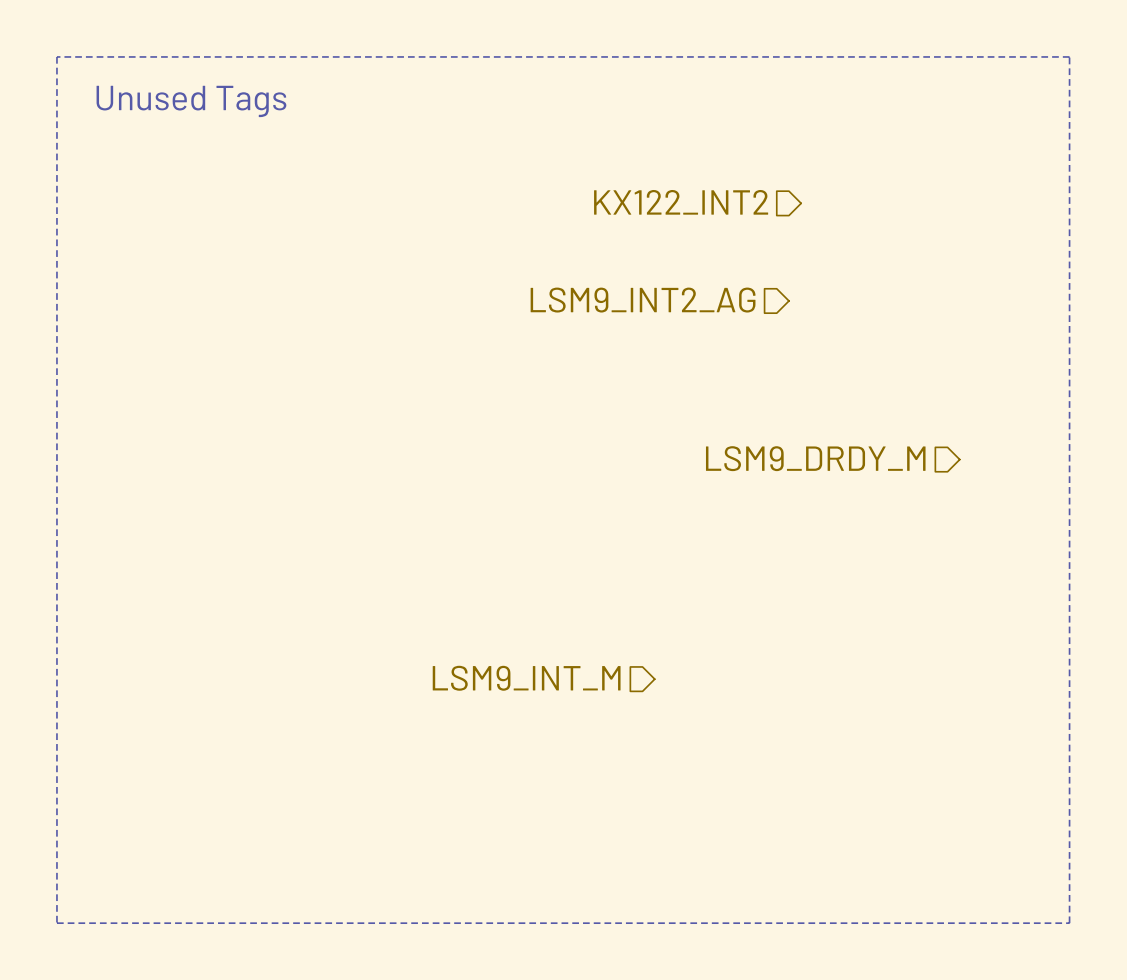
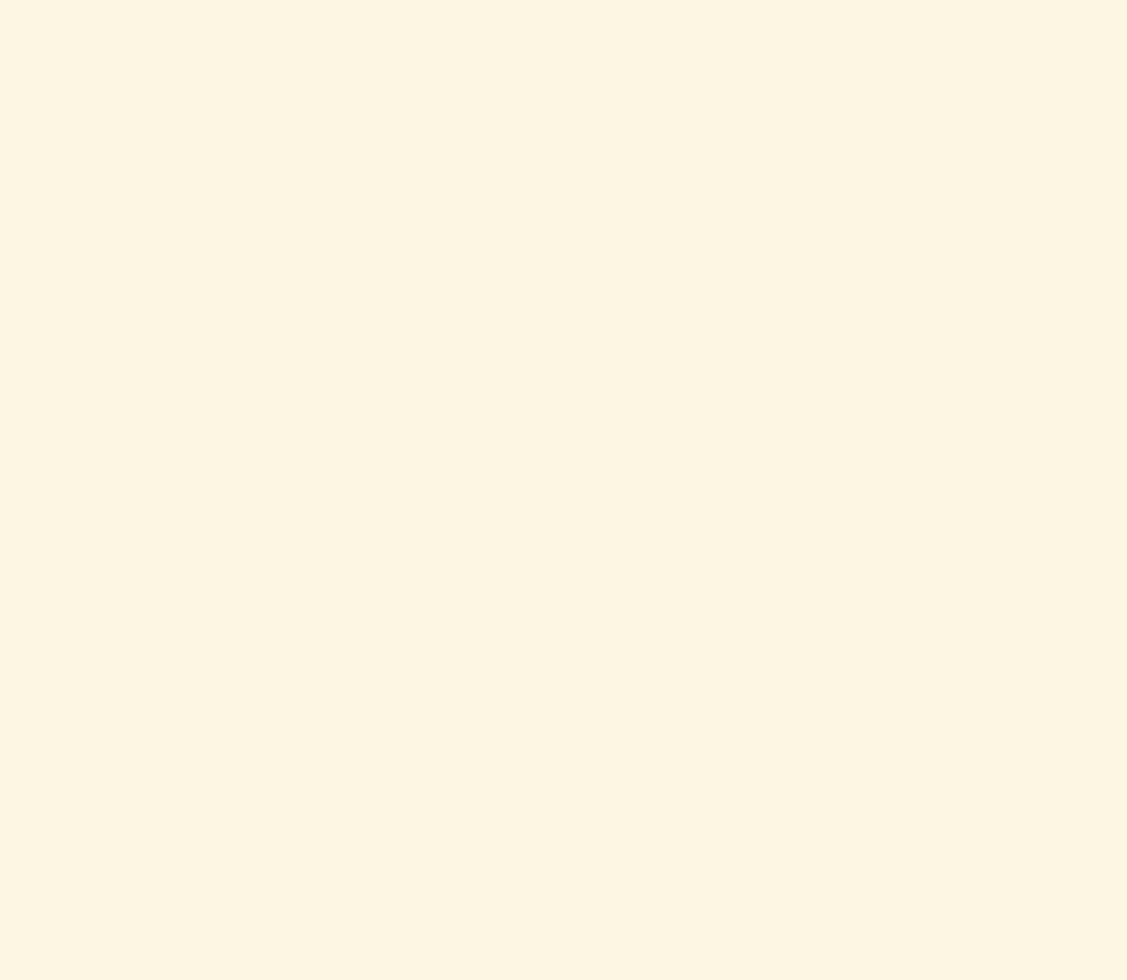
line: (56, 56) (56, 923) (1069, 923) (1069, 56) (56, 56) -> none
text: Unused Tags (191, 101) -> none
hierarchical label: KX122_INT2 (681, 202) -> none
hierarchical label: LSM9_INT2_AG (643, 300) -> none
hierarchical label: LSM9_DRDY_M (815, 458) -> none
hierarchical label: LSM9_INT_M (526, 678) -> none

